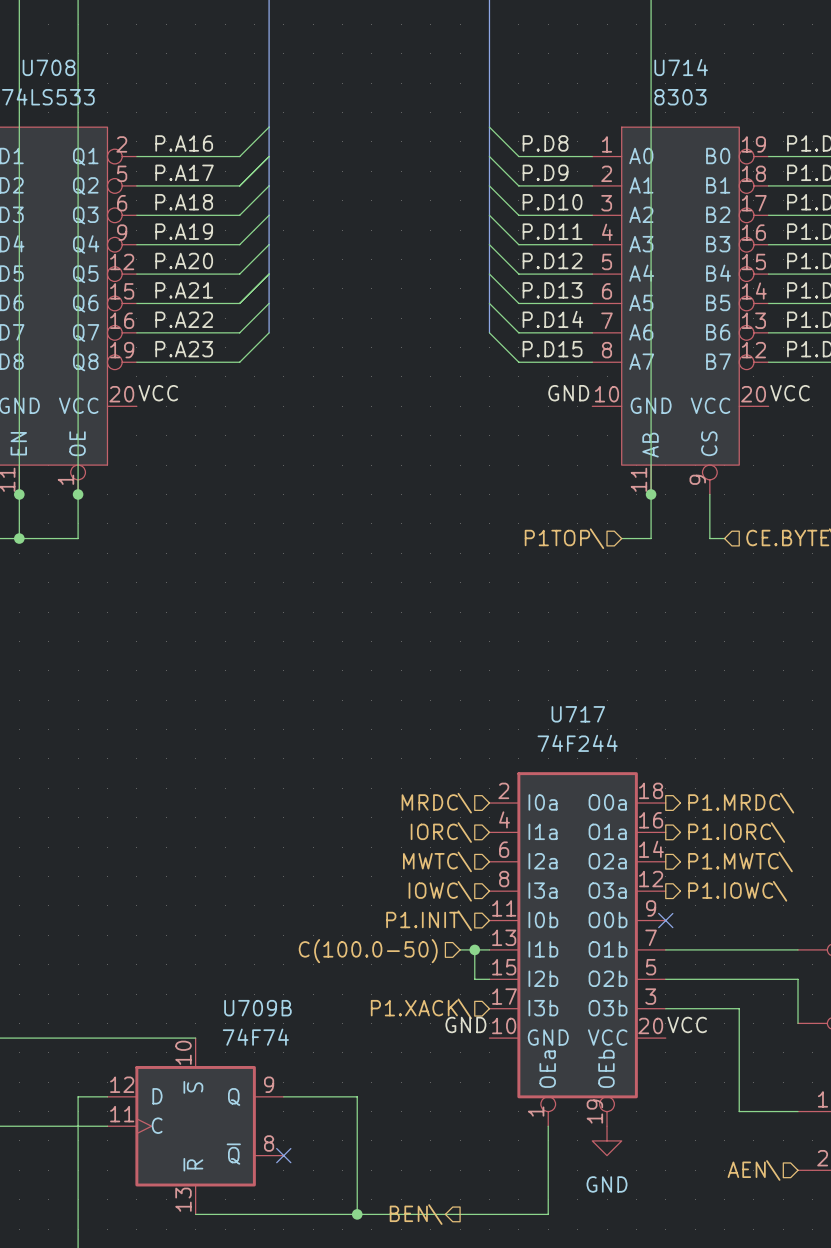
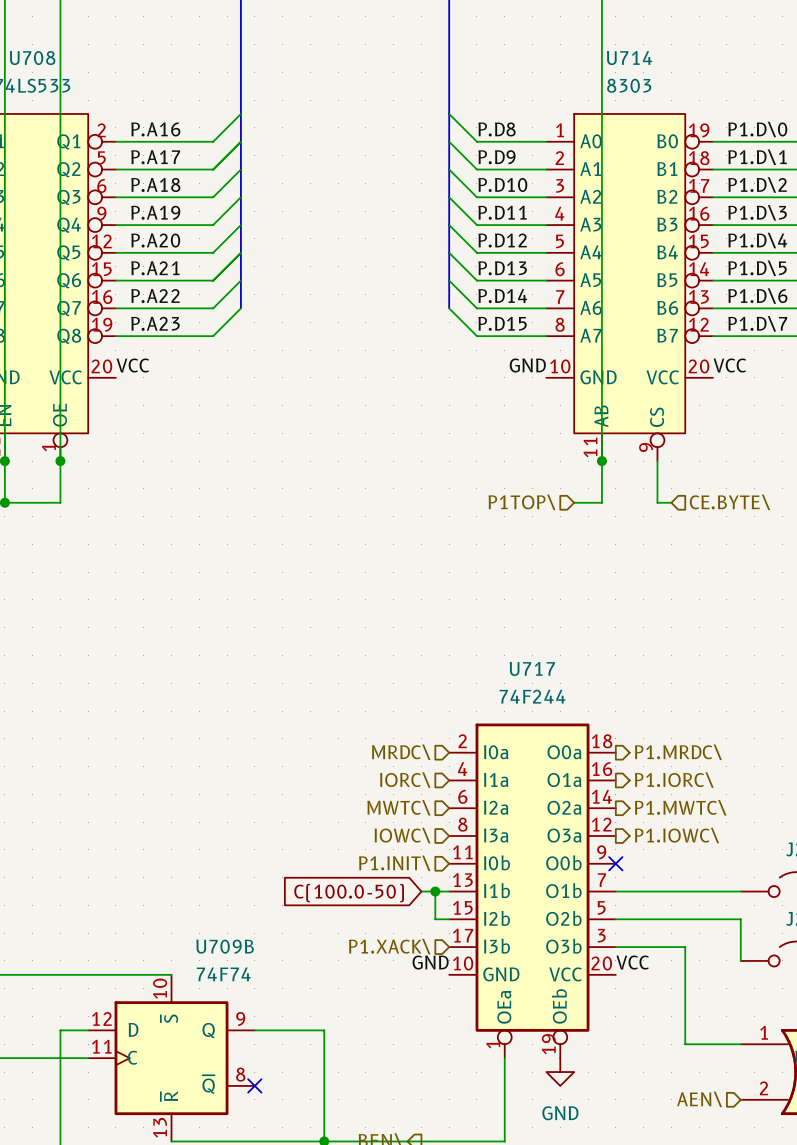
hierarchical label: C(100.0-50) (368, 951) -> none
global label: none -> C(100.0-50) (349, 893)

